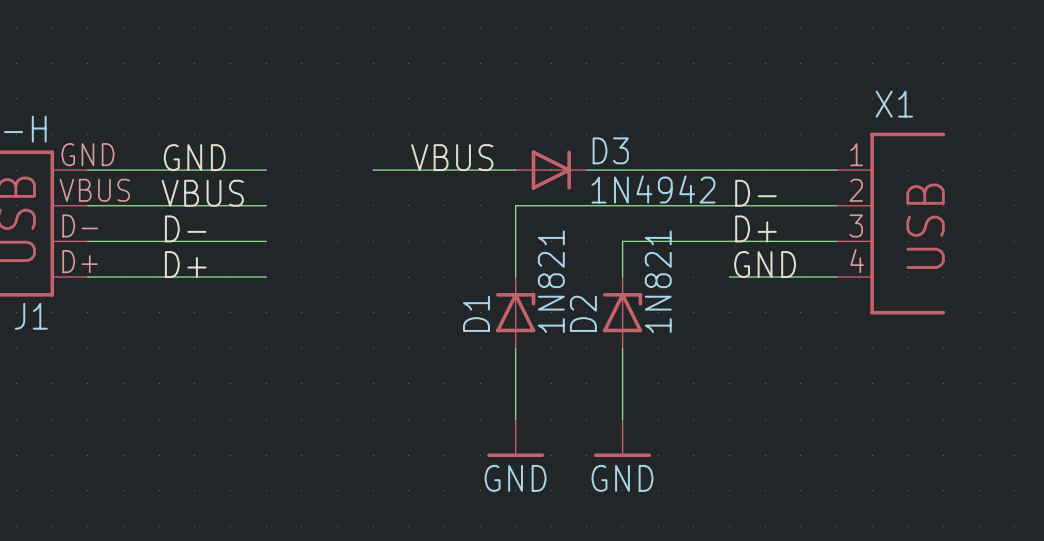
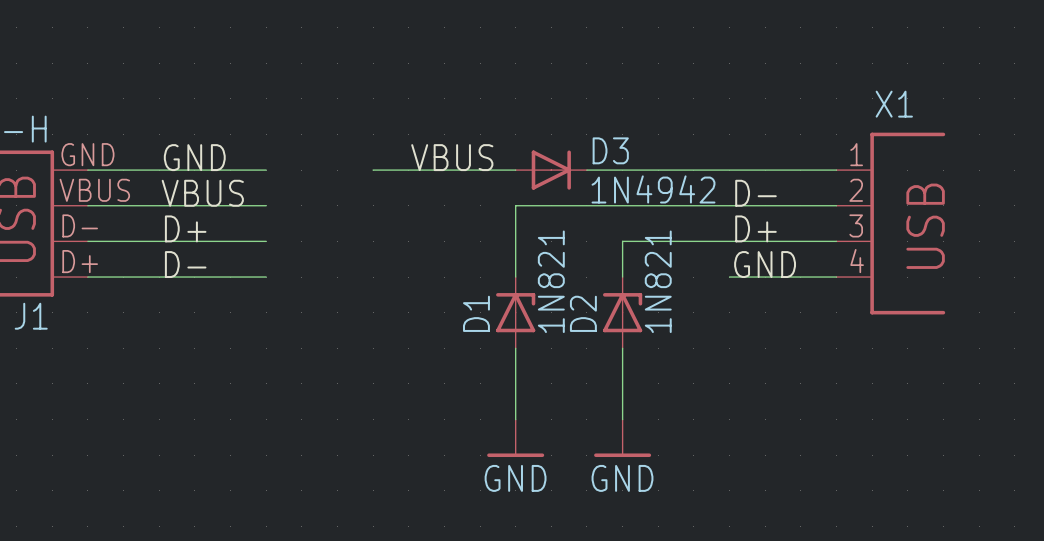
label: D- (185, 228) -> D+ (185, 228)
label: D+ (185, 264) -> D- (185, 264)

